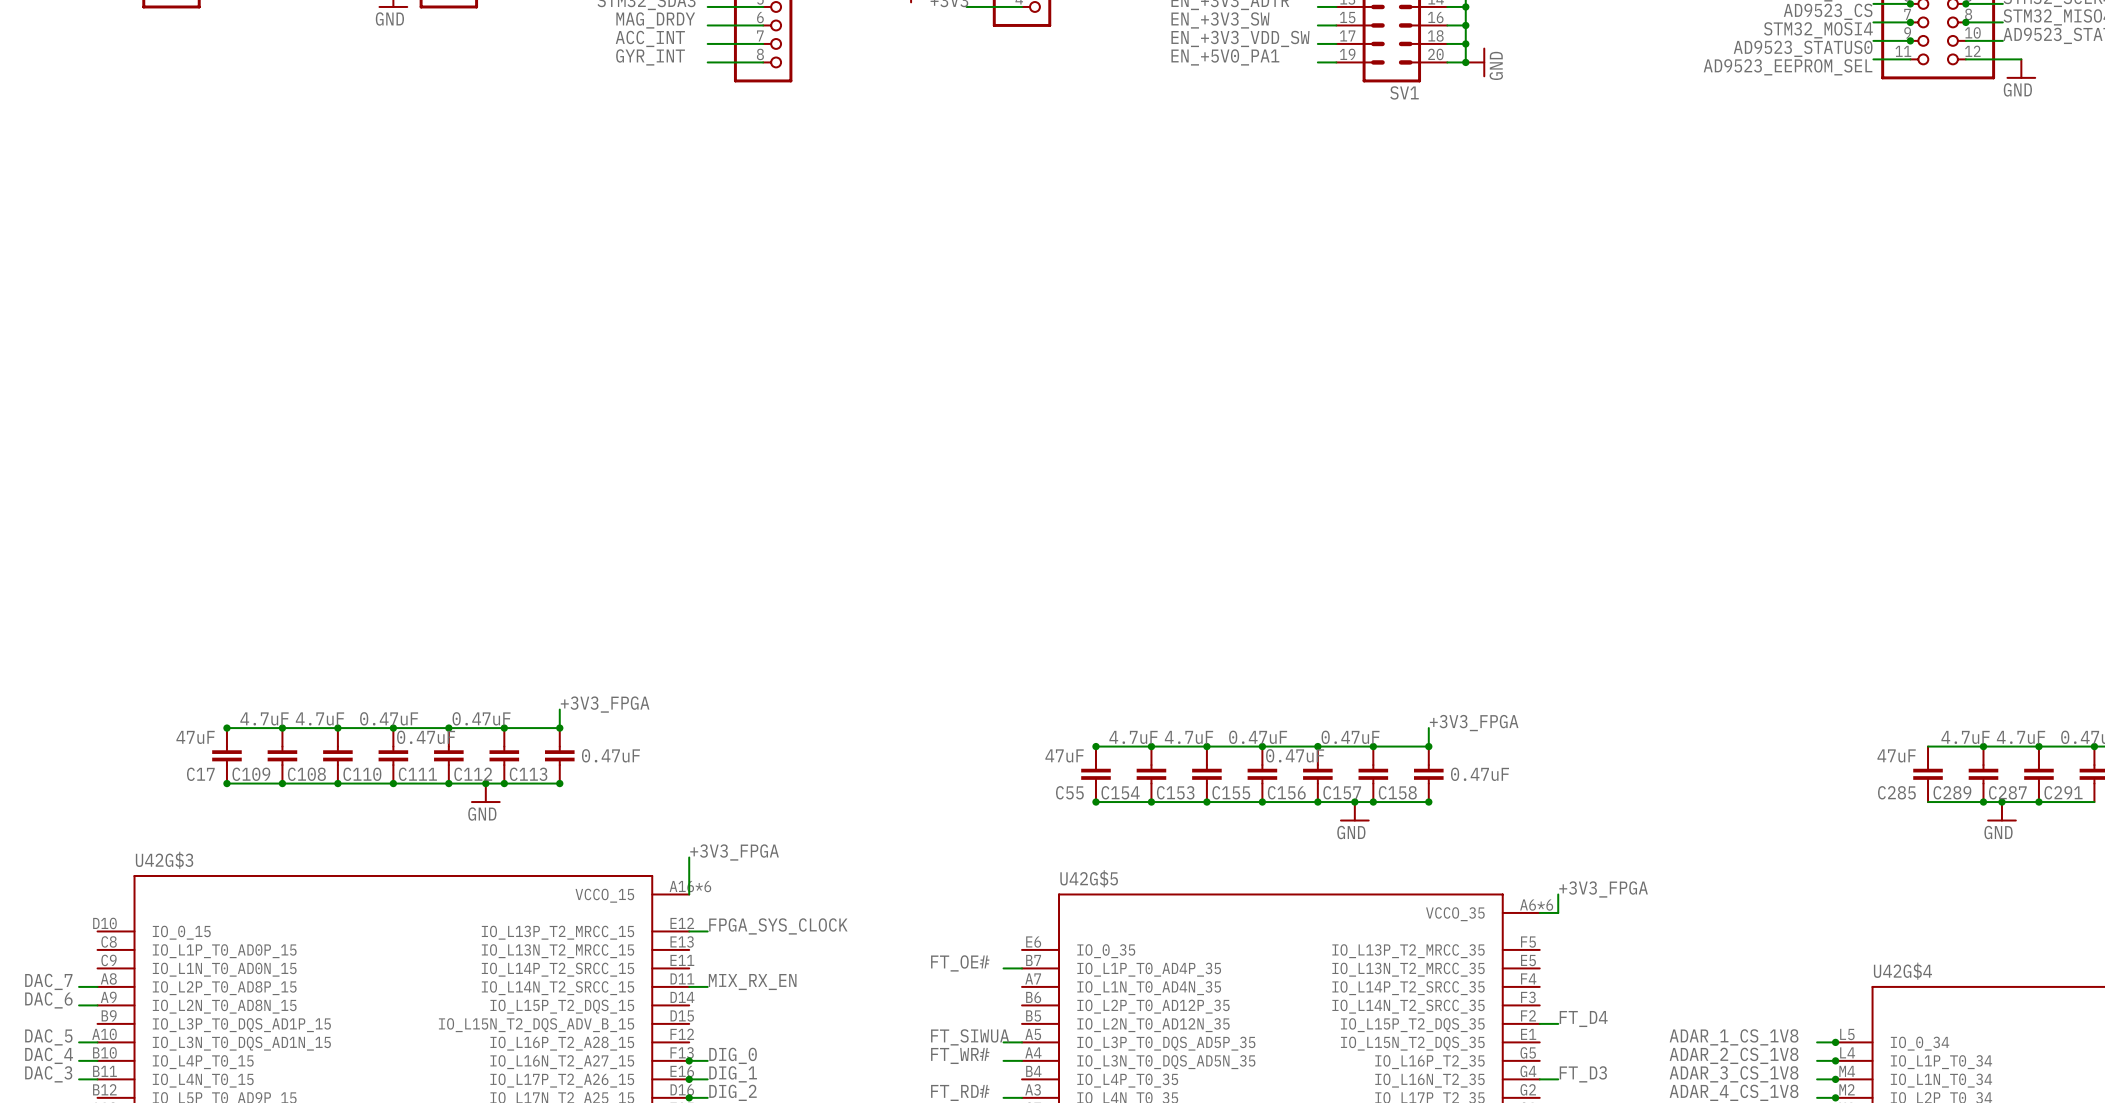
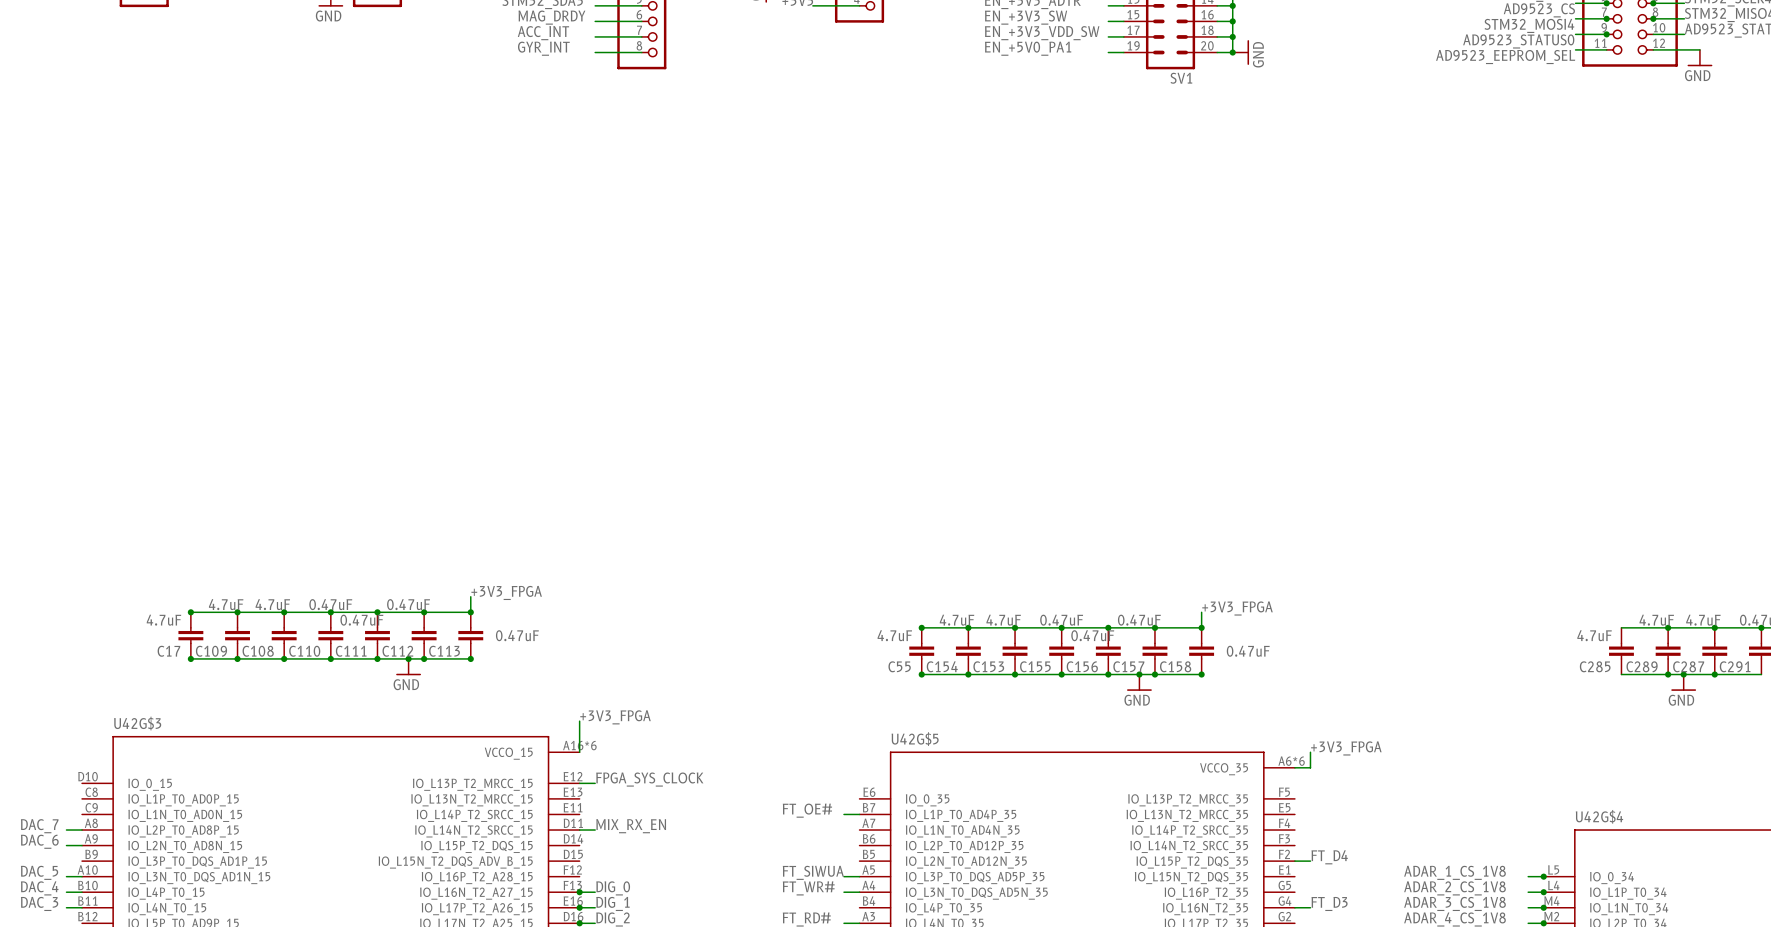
C17 value: 47uF (195, 737) -> 4.7uF (163, 620)
C55 value: 47uF (1064, 755) -> 4.7uF (894, 635)
C285 value: 47uF (1896, 755) -> 4.7uF (1594, 635)

